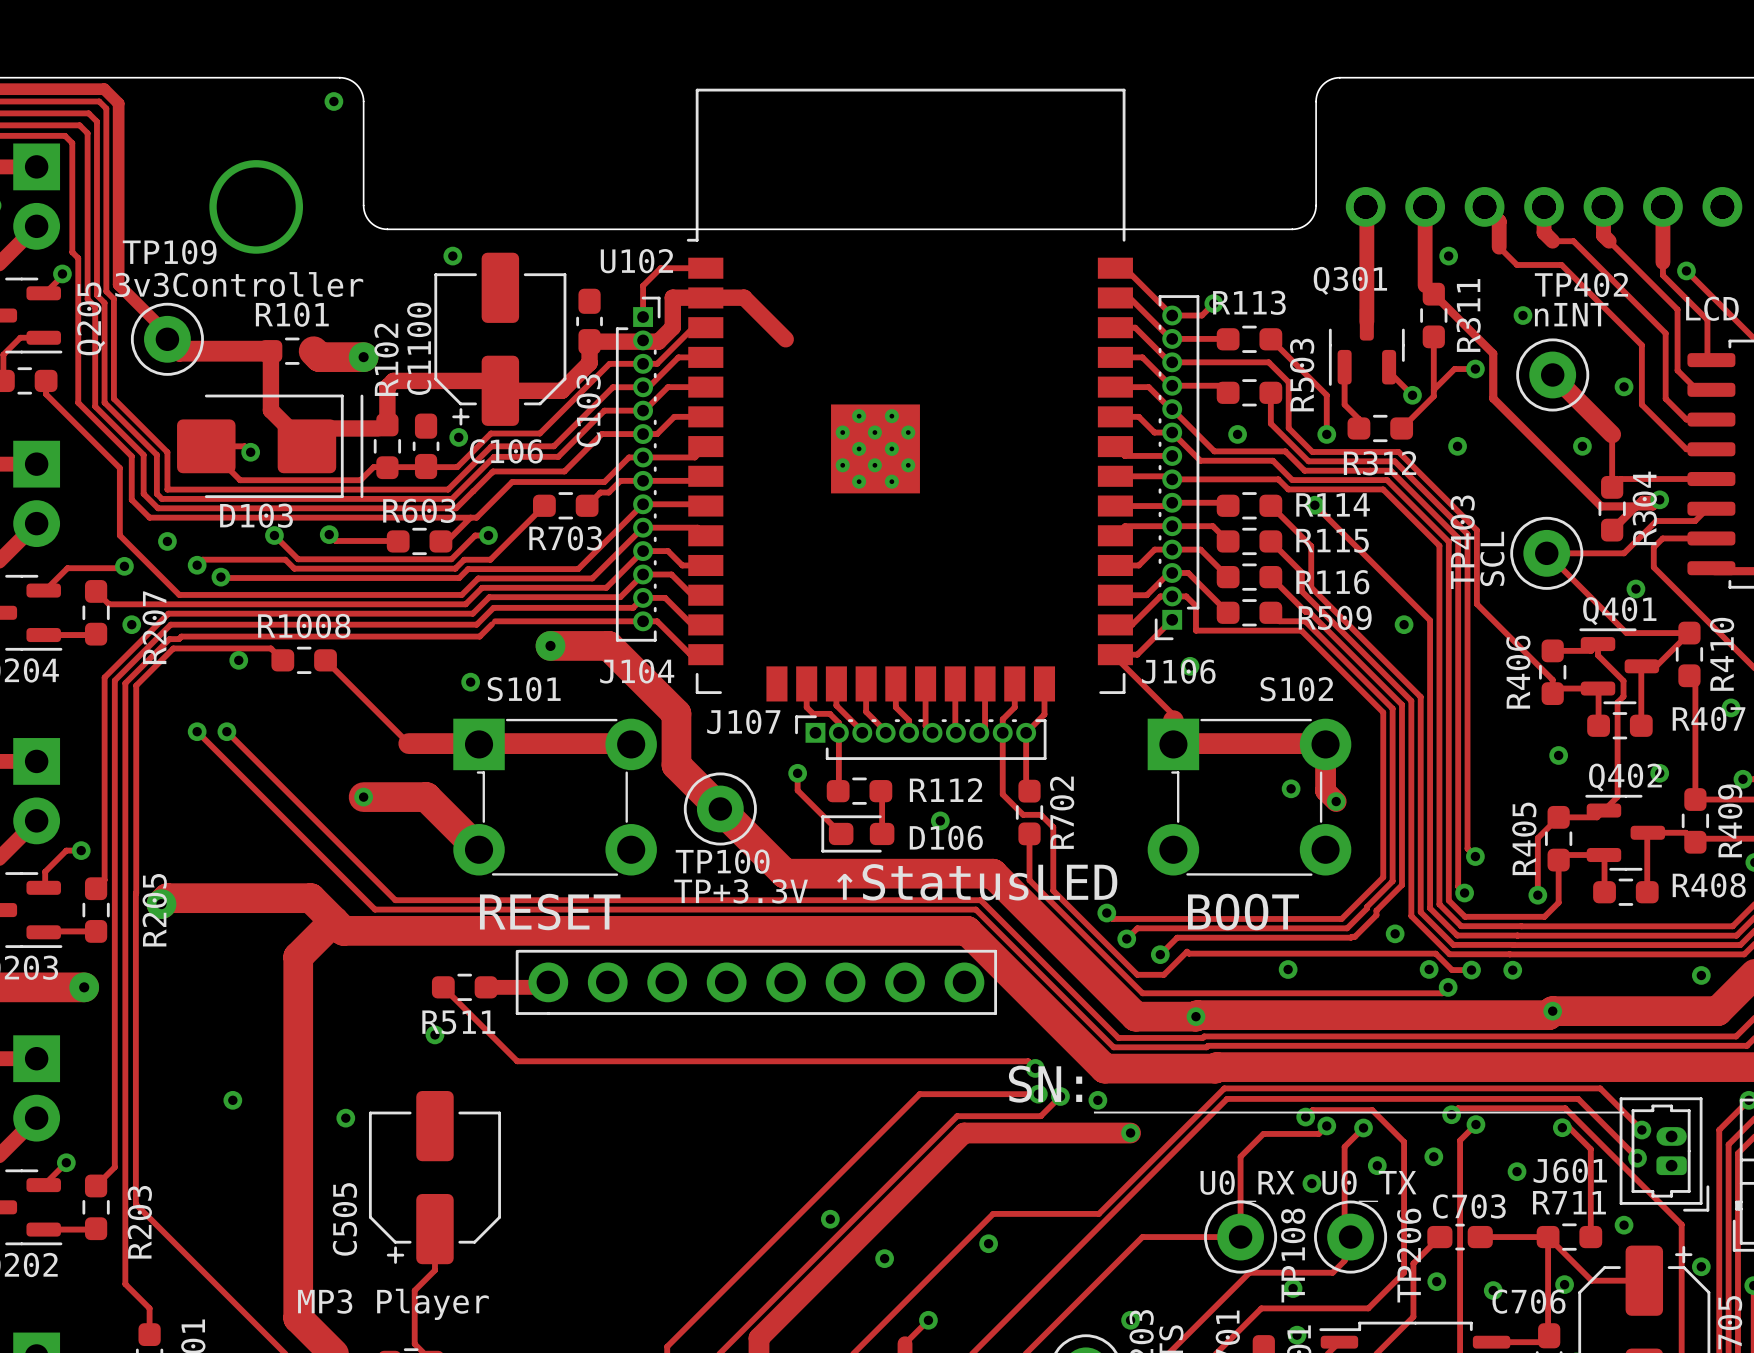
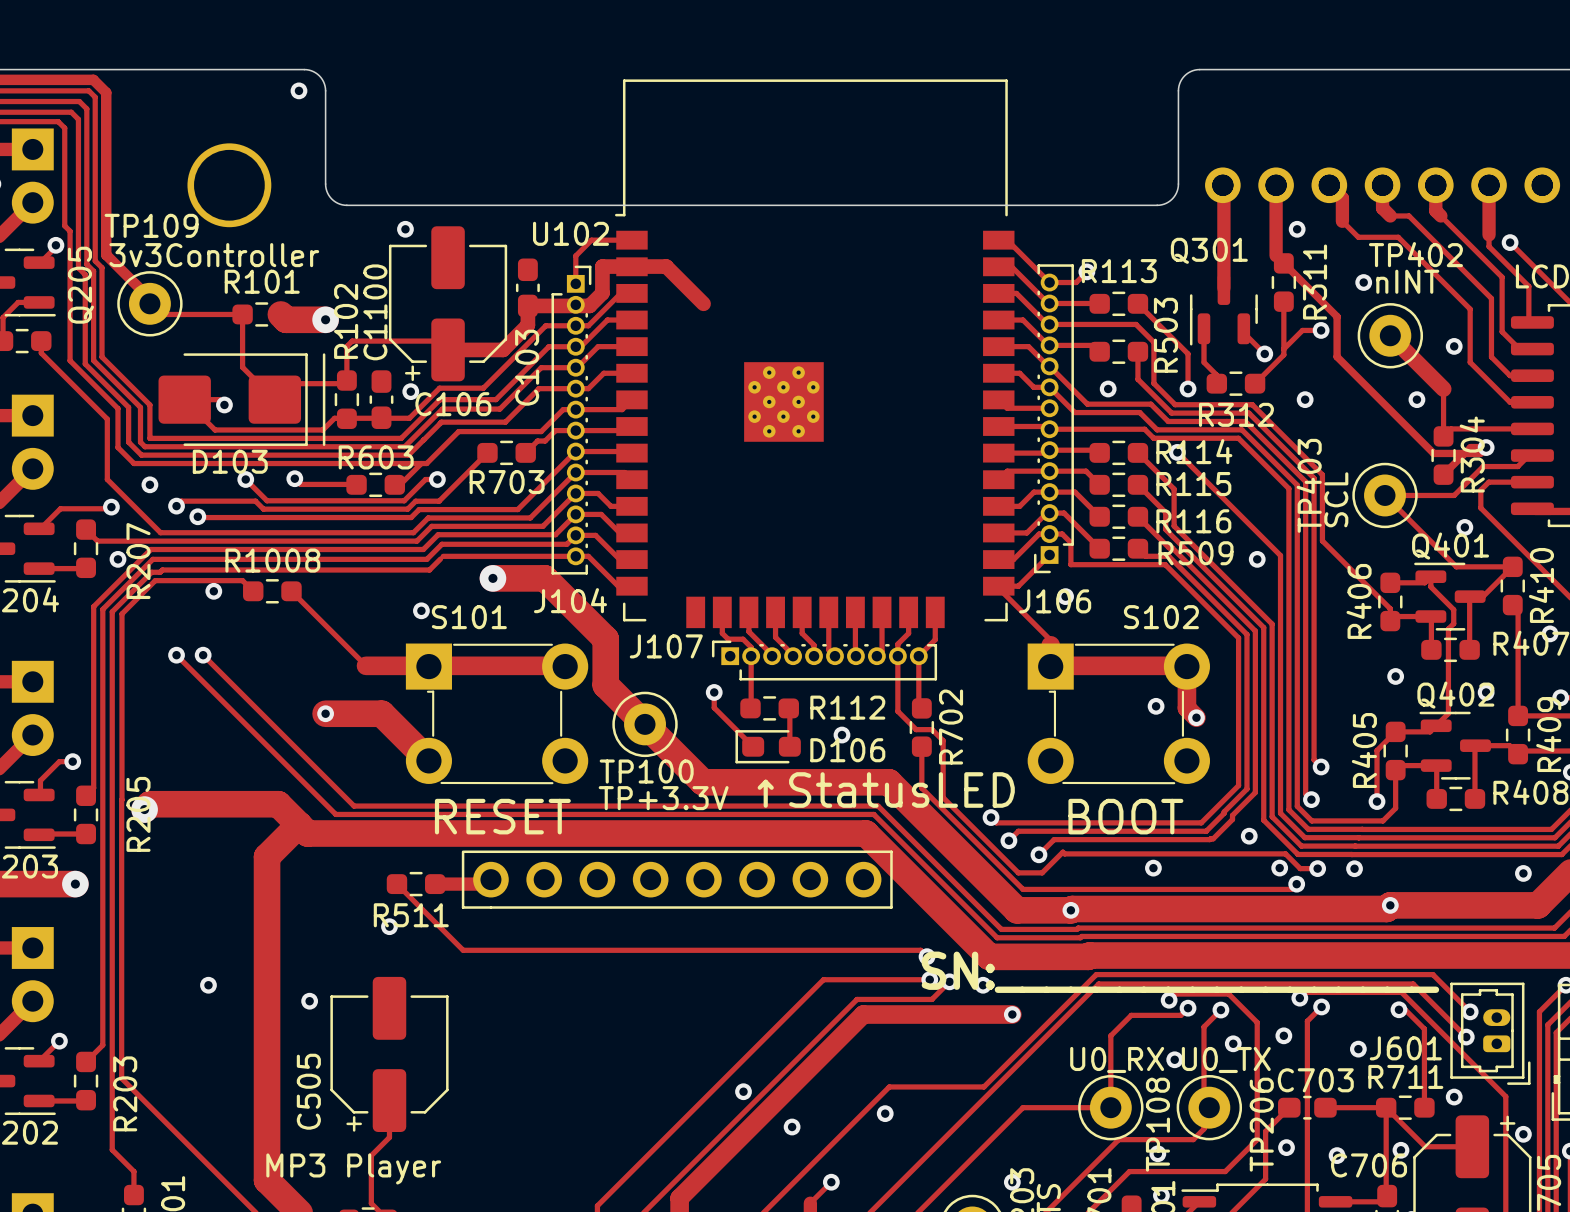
track width: thick (167, 339) (179, 351) (270, 351) (270, 410) (306, 446) (324, 428) (378, 428) -> thin (149, 303) (160, 314) (242, 314) (242, 367) (274, 399) (290, 383) (338, 383)
track width: thick (490, 380) (393, 380) (387, 386) (387, 424) -> thin (439, 341) (352, 341) (346, 346) (346, 380)

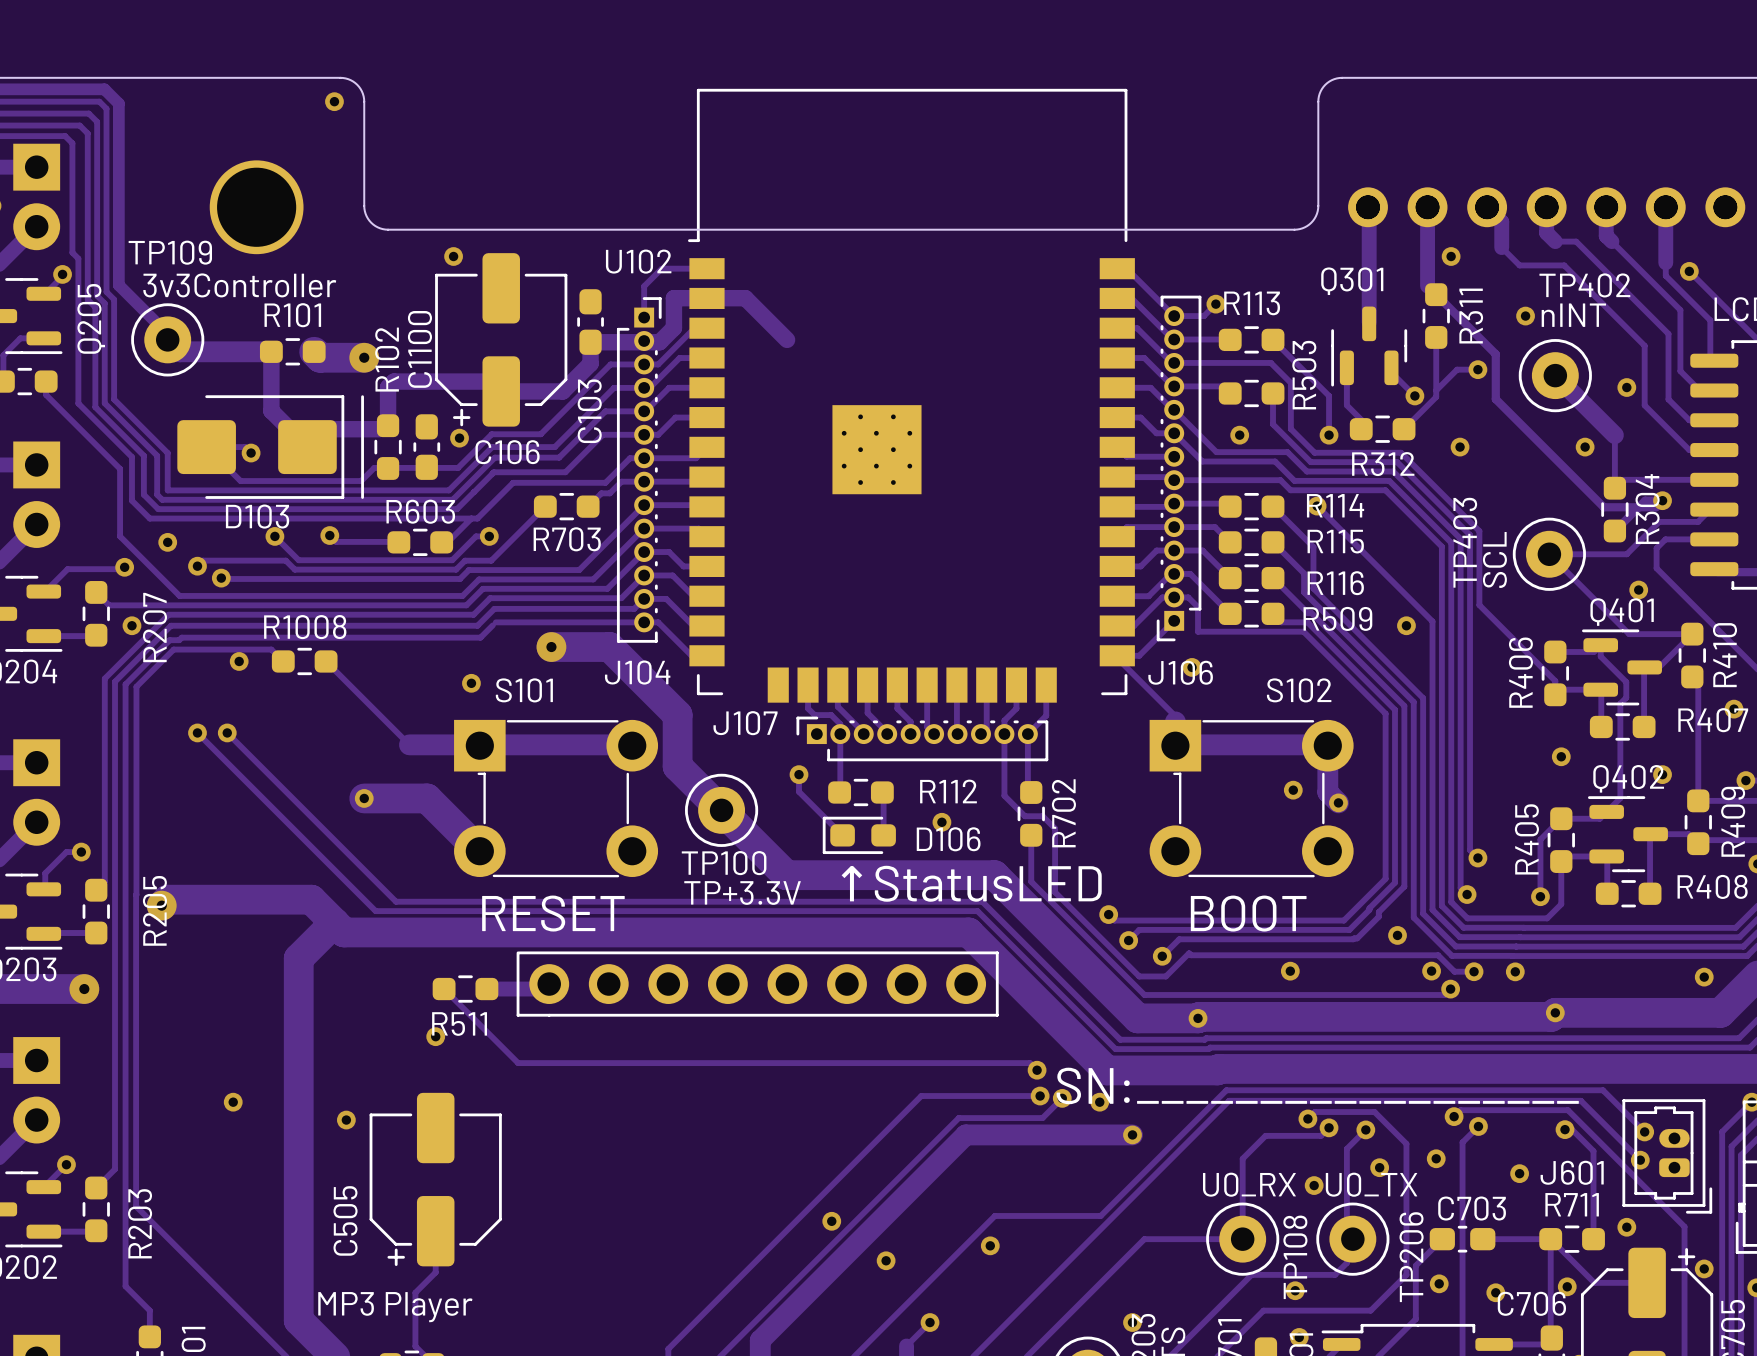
track width: thin (149, 303) (160, 314) (242, 314) (242, 367) (274, 399) (290, 383) (338, 383) -> thick (167, 339) (179, 351) (271, 351) (271, 411) (307, 447) (325, 429) (379, 429)
track width: thin (439, 341) (352, 341) (346, 346) (346, 380) -> thick (491, 381) (394, 381) (388, 387) (388, 425)

